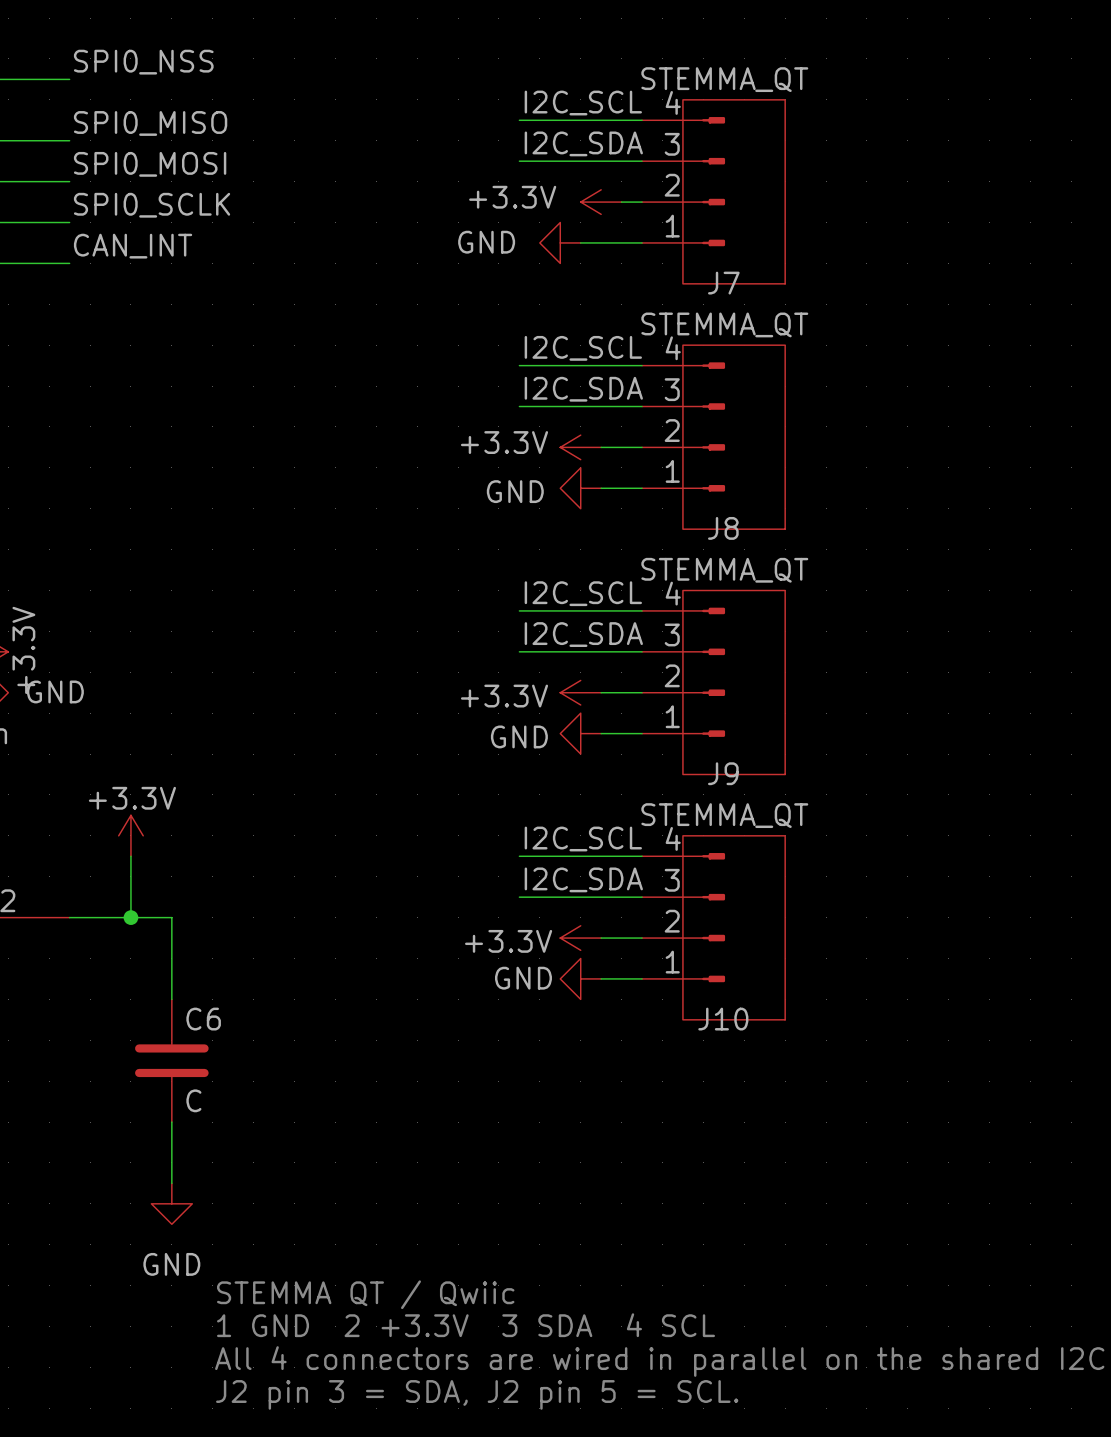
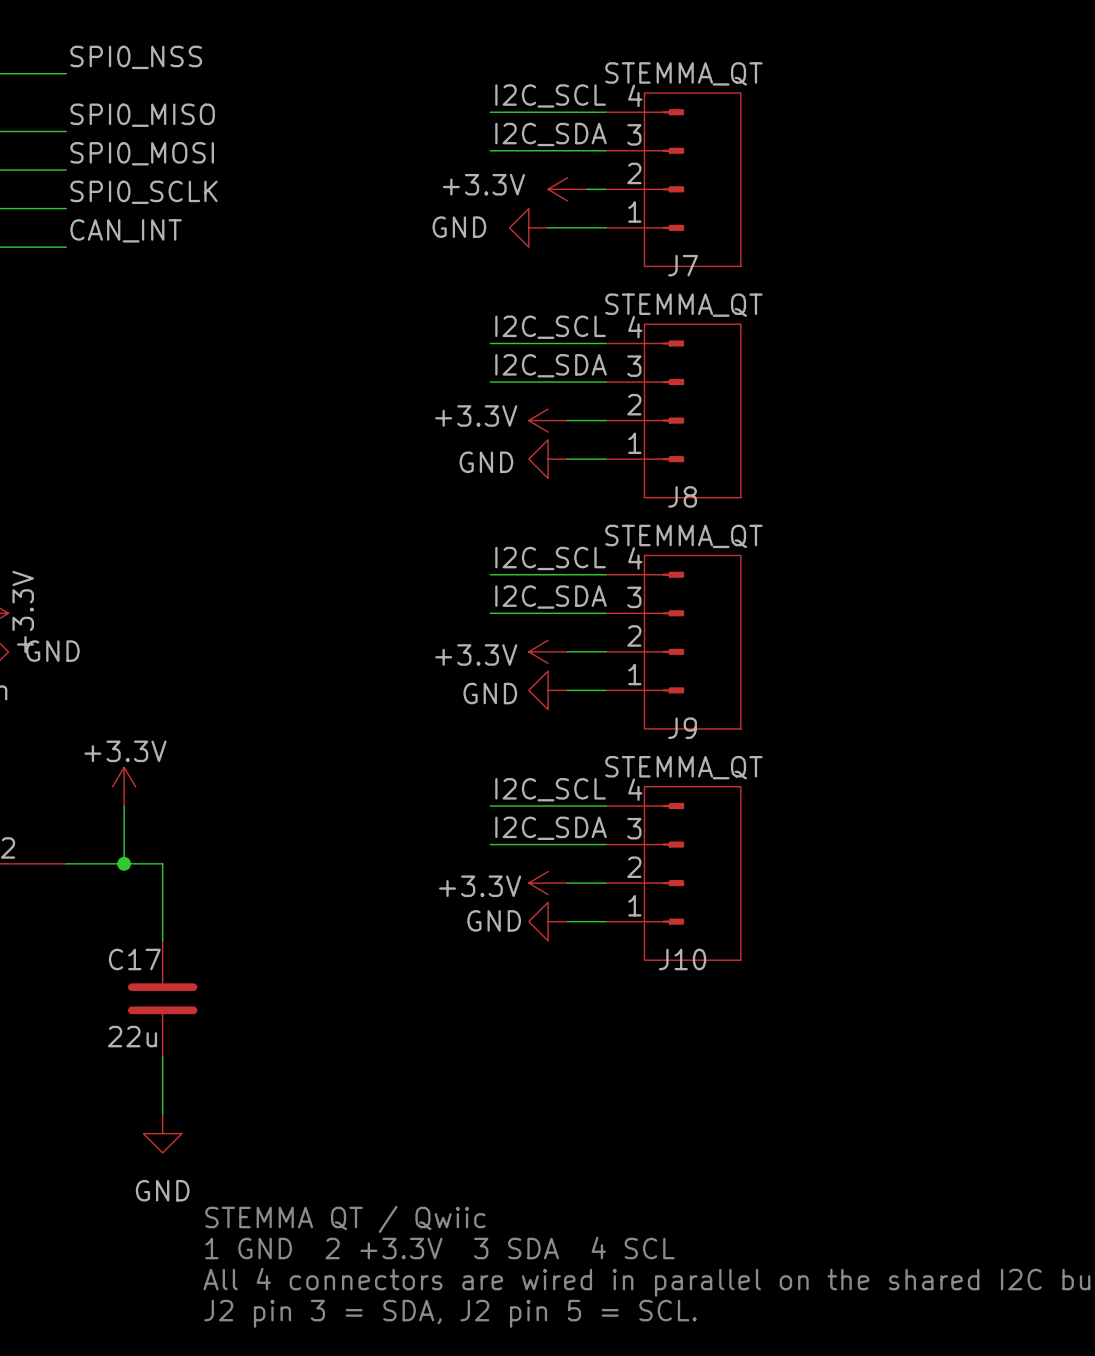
C6 name: C6 (203, 1019) -> C17 (134, 959)
C6 value: C (193, 1100) -> 22u (132, 1036)

